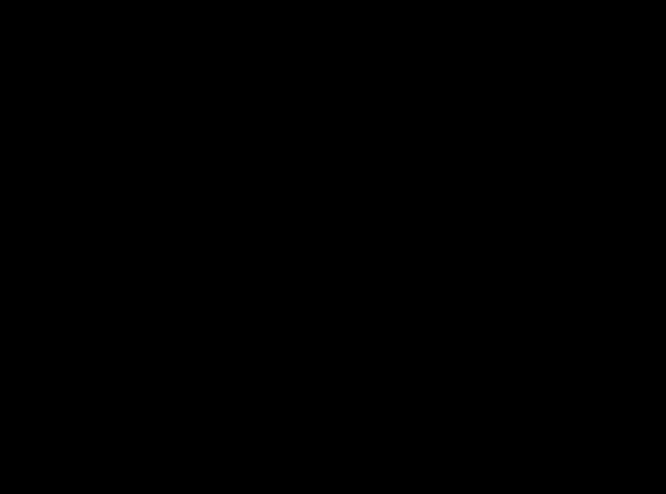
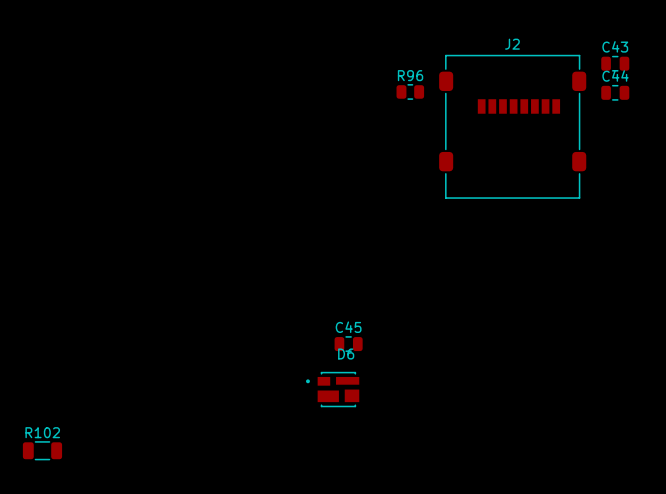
C43: none -> (615, 63)
R96: none -> (410, 91)
C44: none -> (615, 92)
J2: none -> (512, 126)
C45: none -> (348, 344)
D6: none -> (332, 389)
R102: none -> (42, 450)

